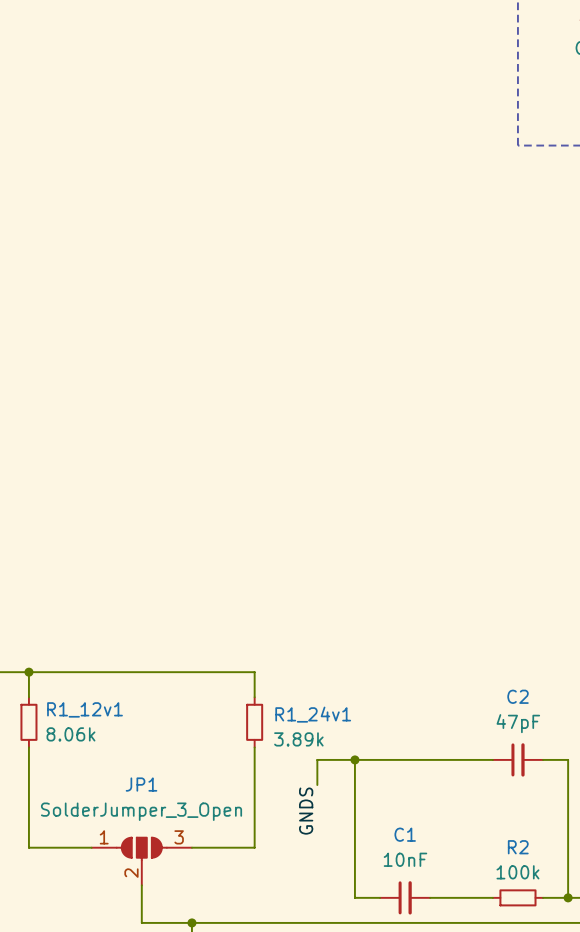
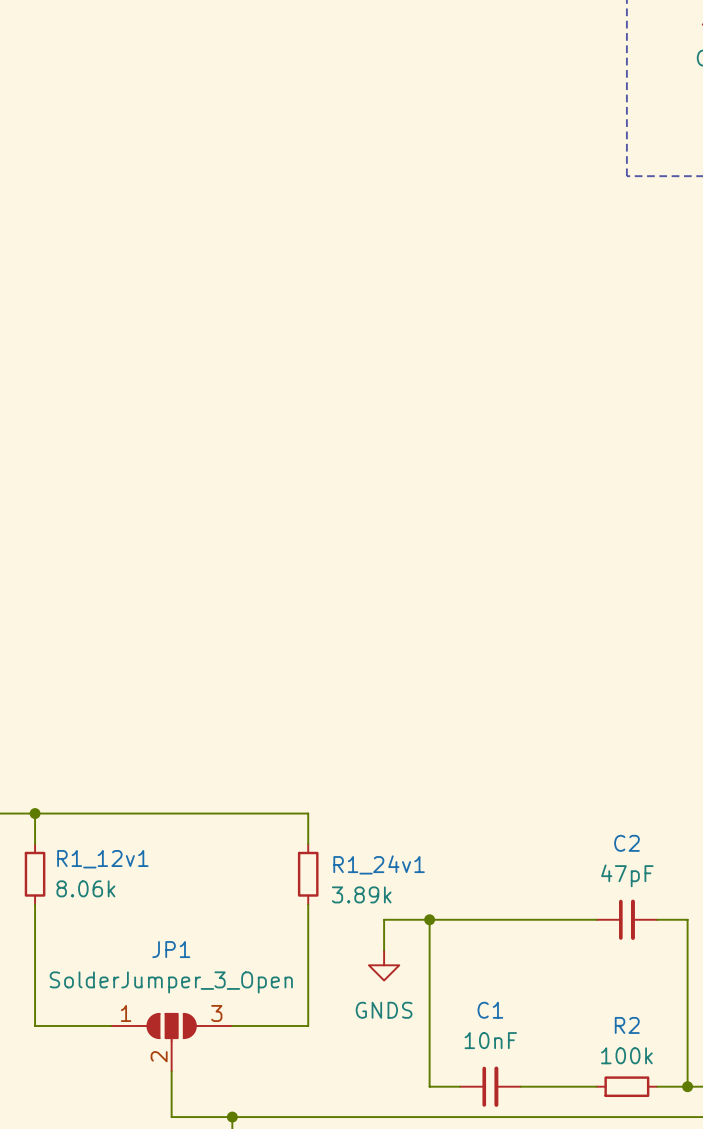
power symbol: none -> GNDS (384, 965)
label: GNDS (306, 811) -> none

